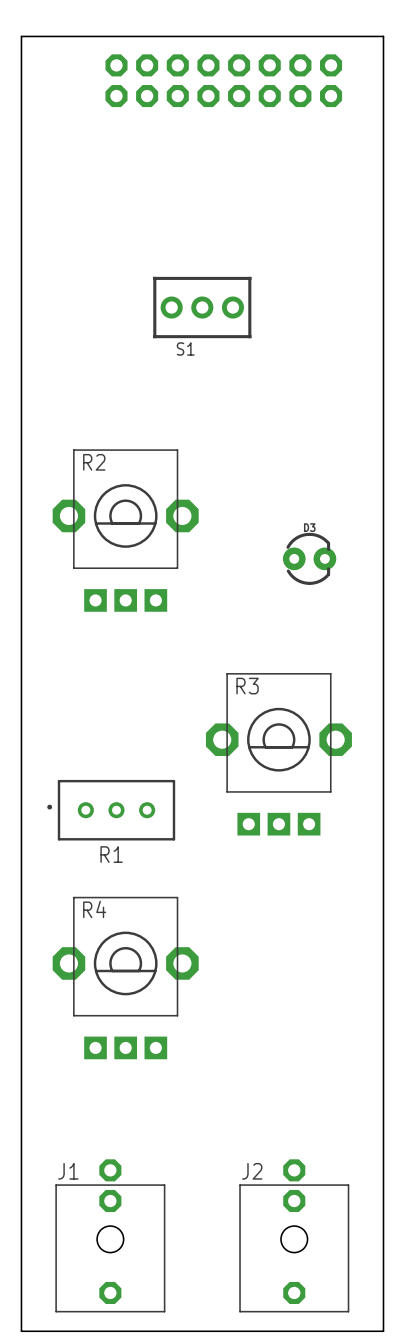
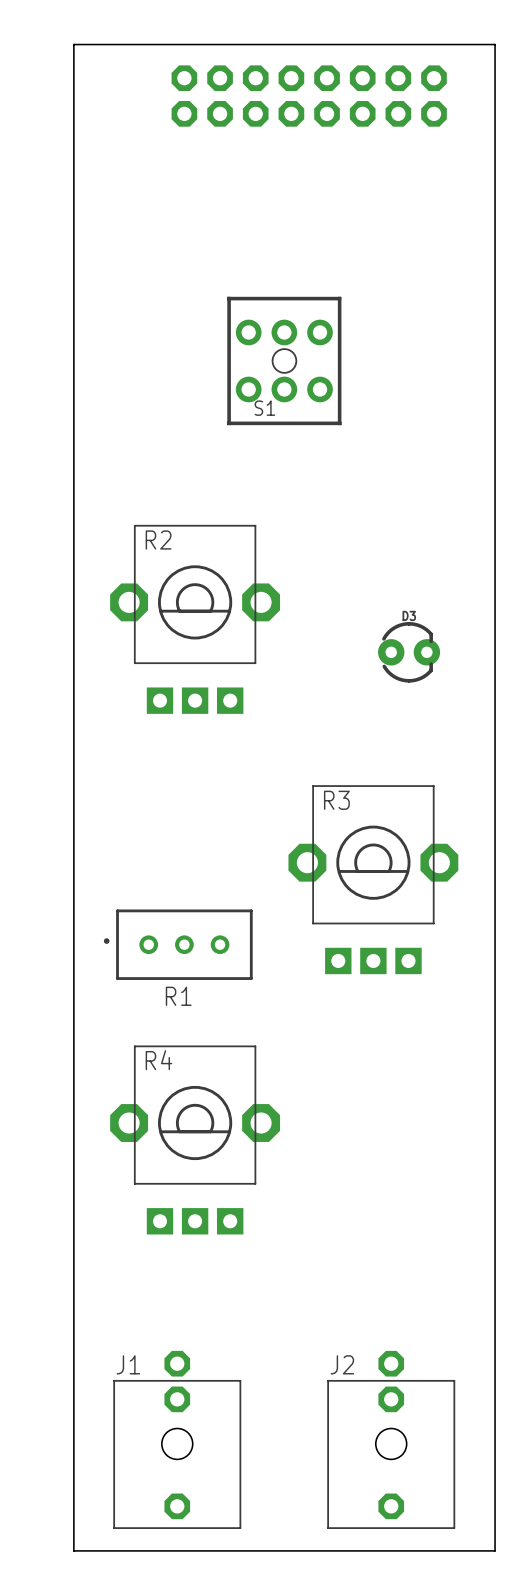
part footprint: [153, 276, 252, 339] -> [227, 296, 342, 426]

